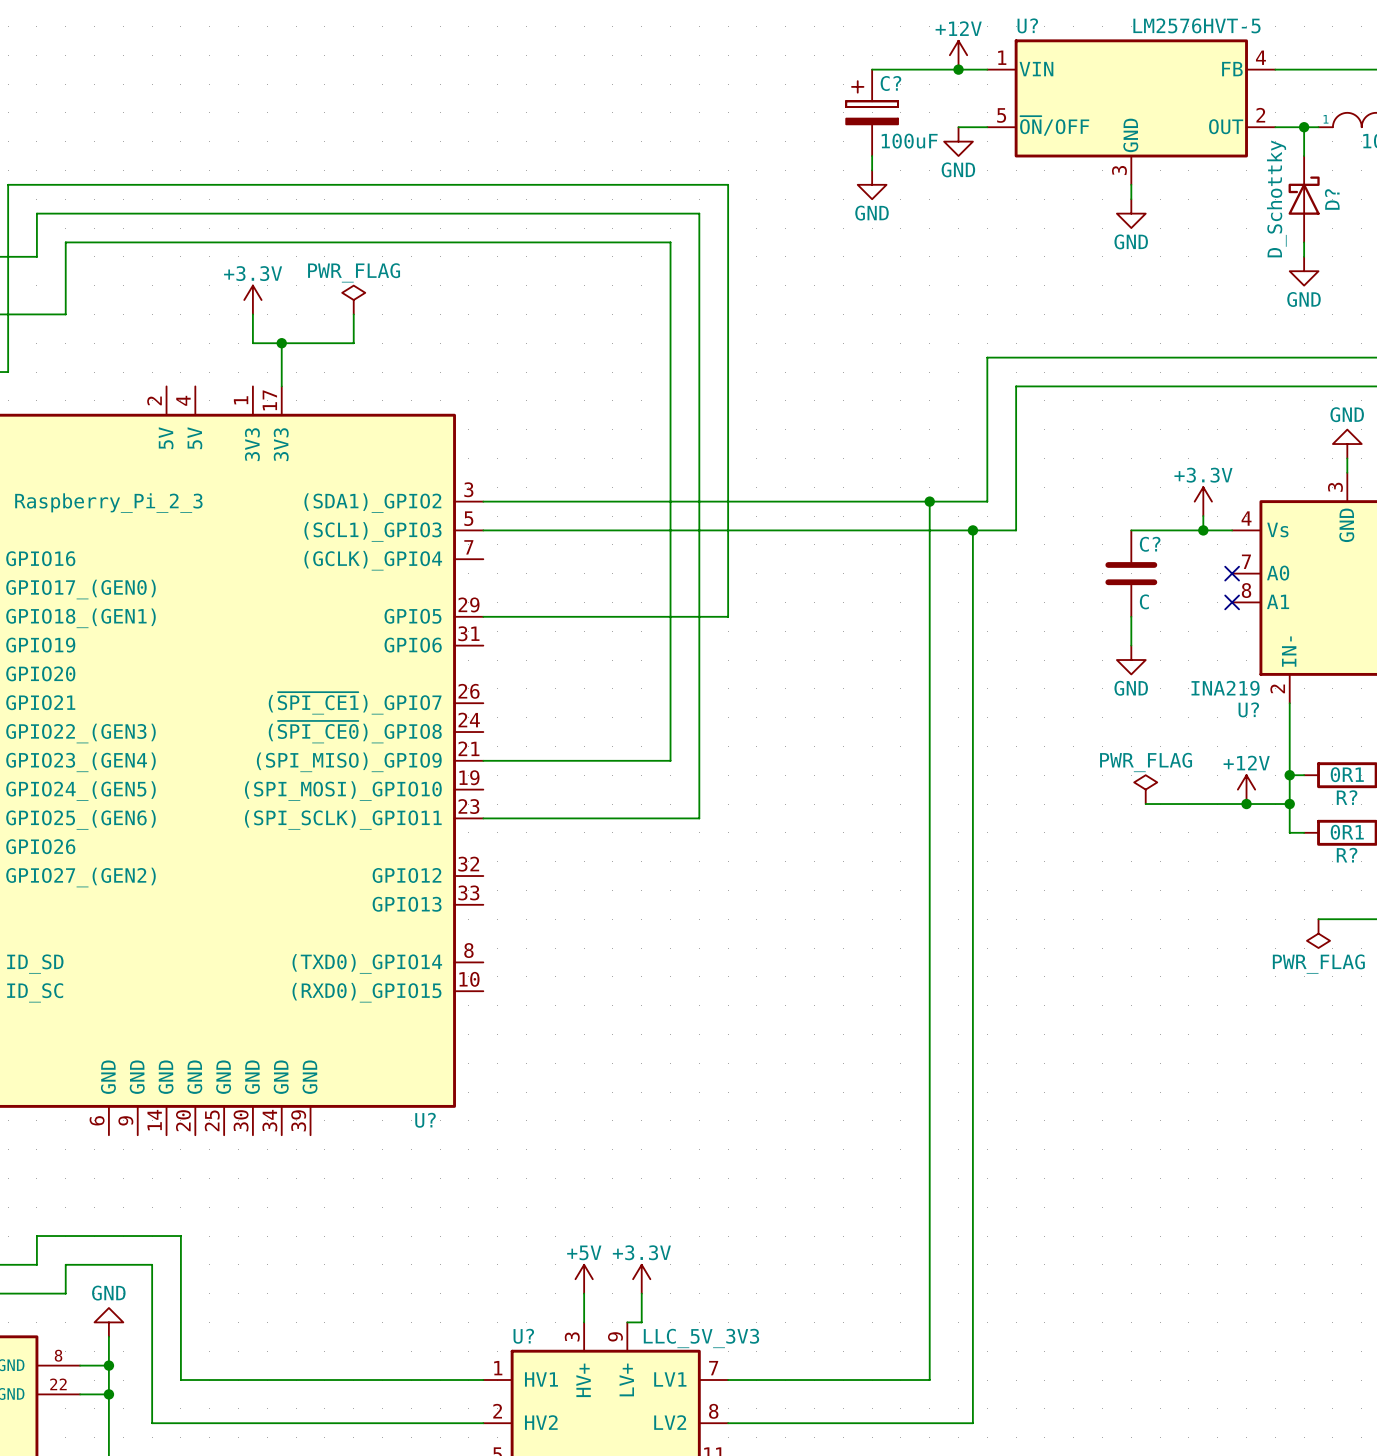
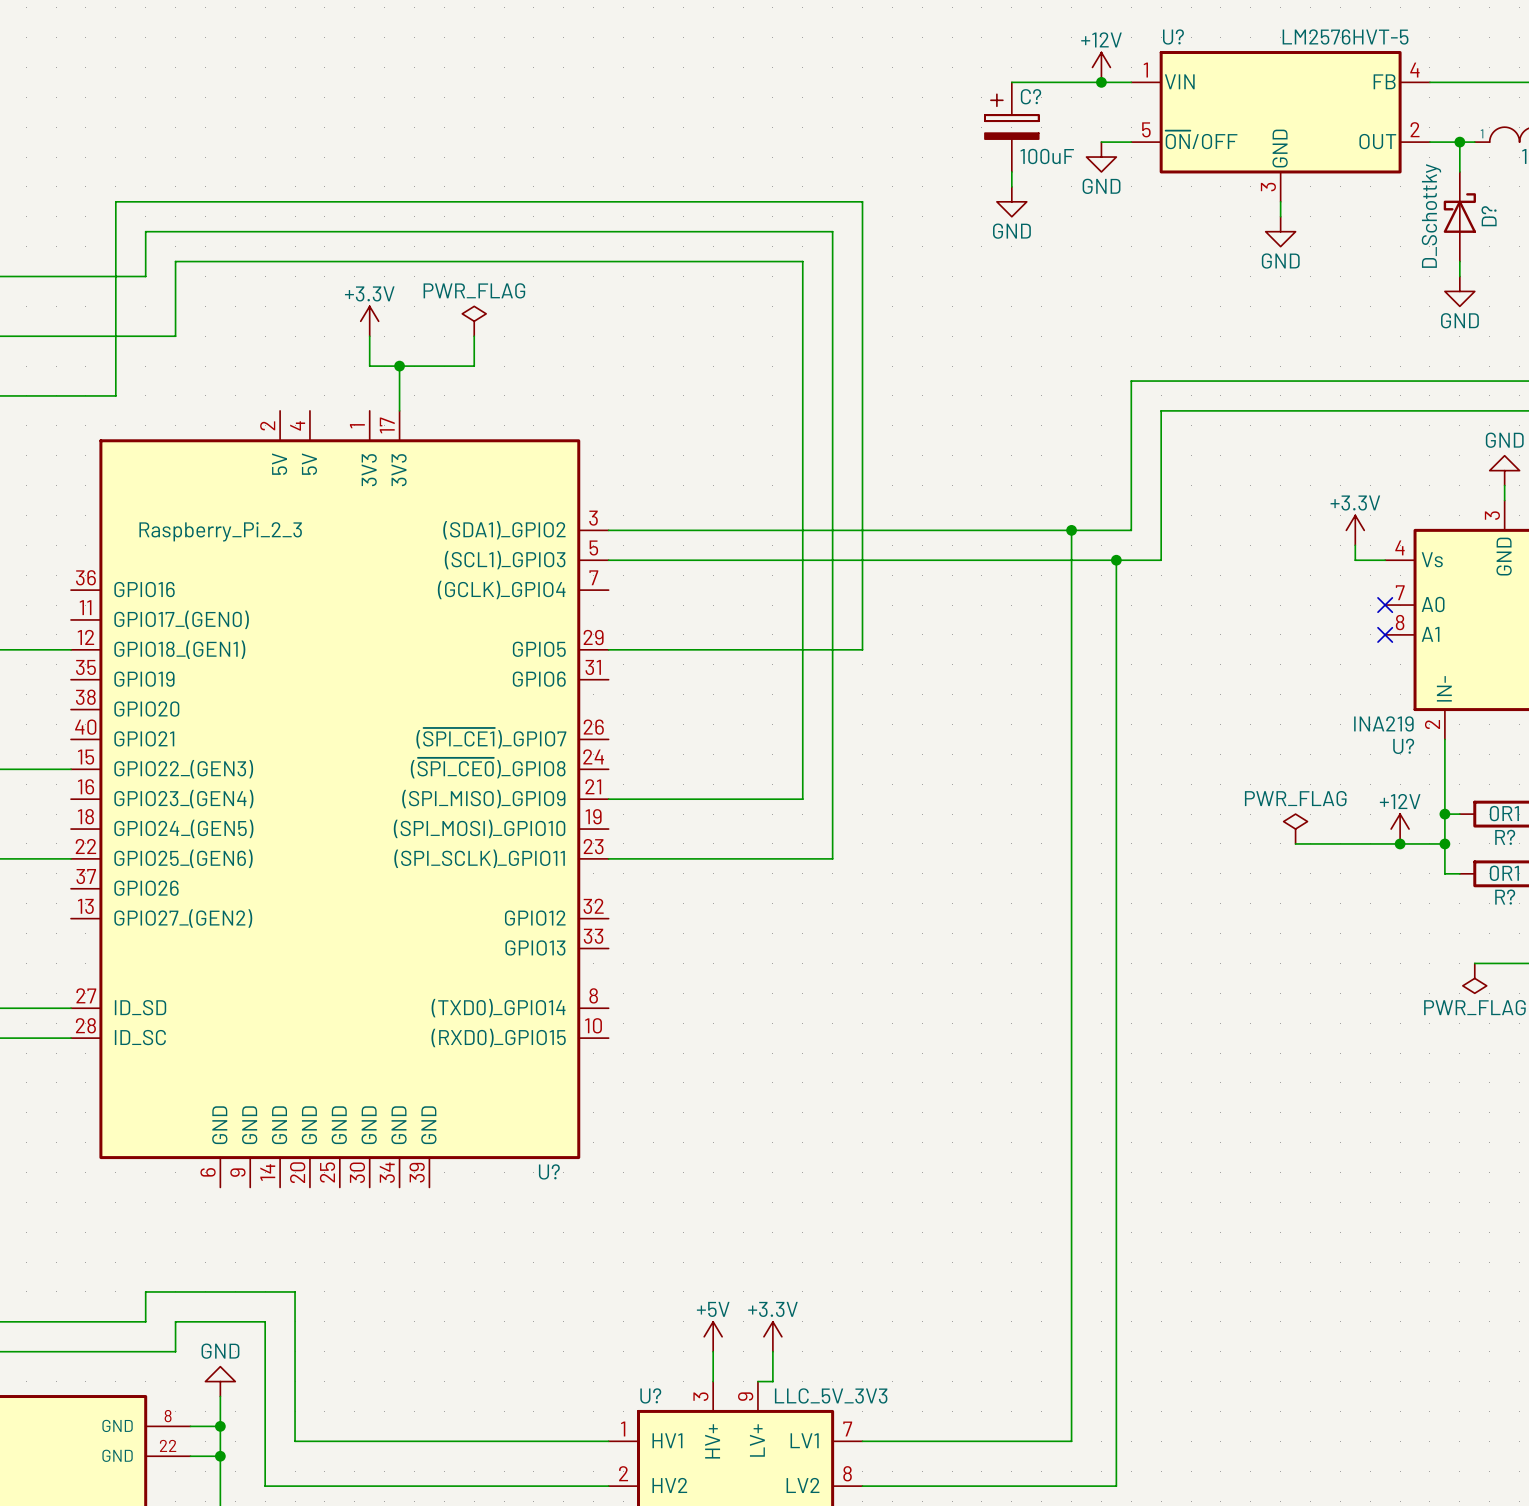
wire: (1131, 530) (1203, 530) -> none
junction: (1203, 530) -> none
C?: C (1131, 573) -> none
wire: (1131, 616) (1131, 645) -> none
power symbol: GND (1131, 660) -> none

